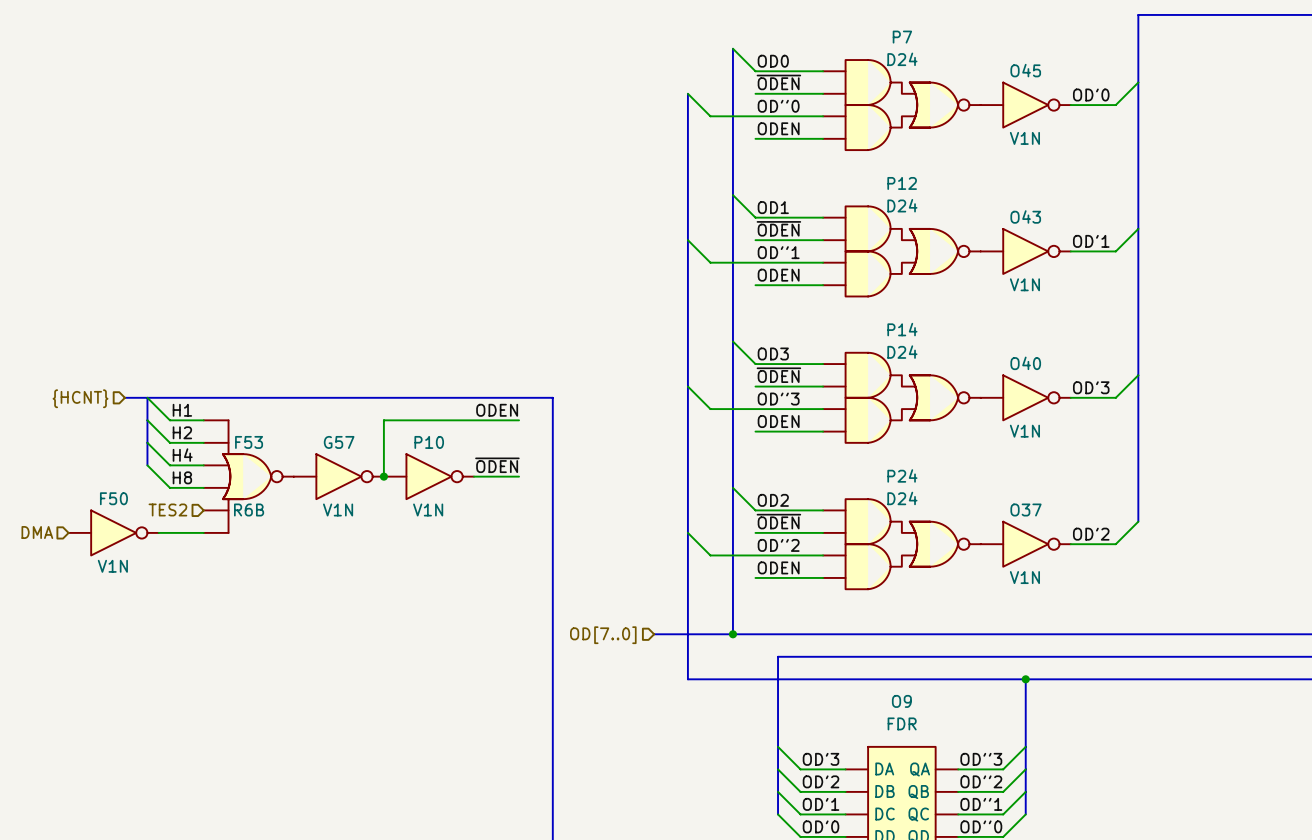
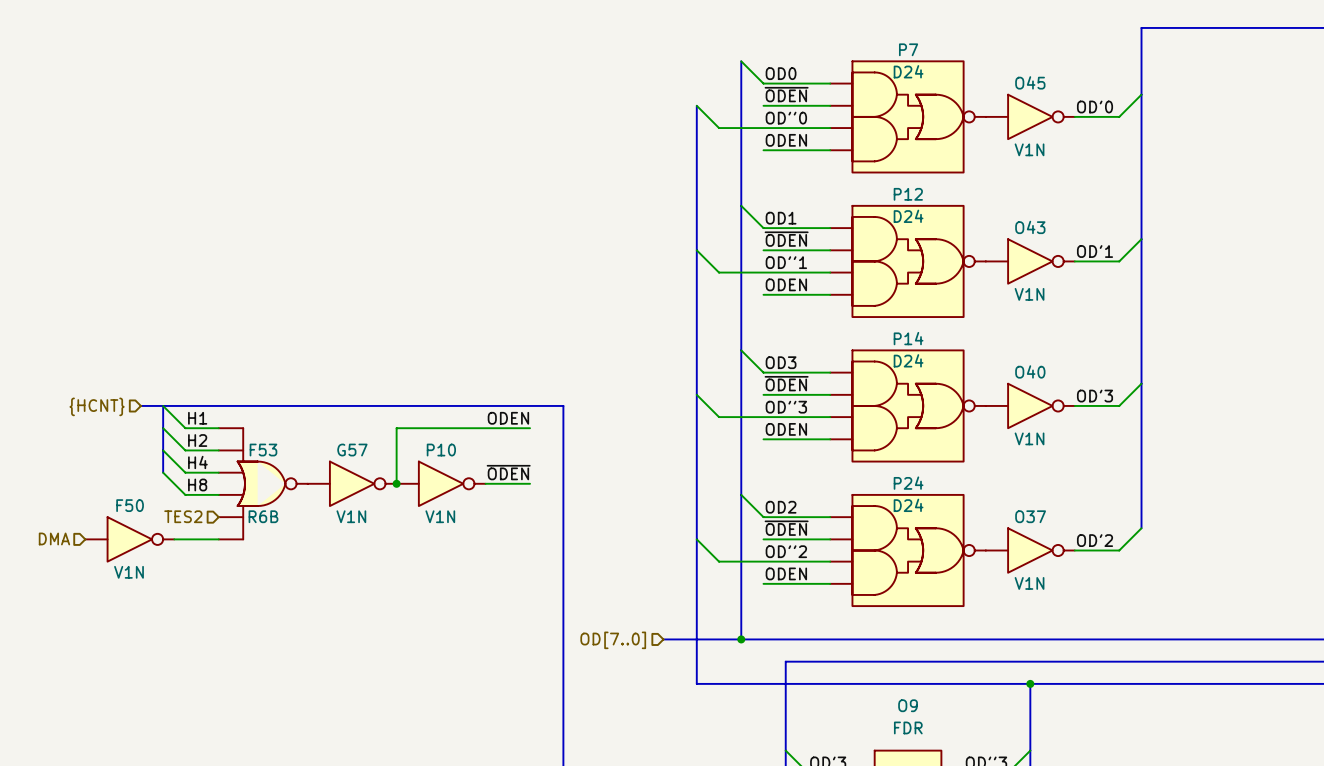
P7 symbol: [823, 60, 981, 151] -> [830, 61, 986, 173]
P12 symbol: [823, 206, 981, 297] -> [830, 205, 986, 318]
P14 symbol: [823, 352, 981, 443] -> [830, 350, 986, 462]
P24 symbol: [823, 499, 981, 590] -> [830, 494, 986, 607]

